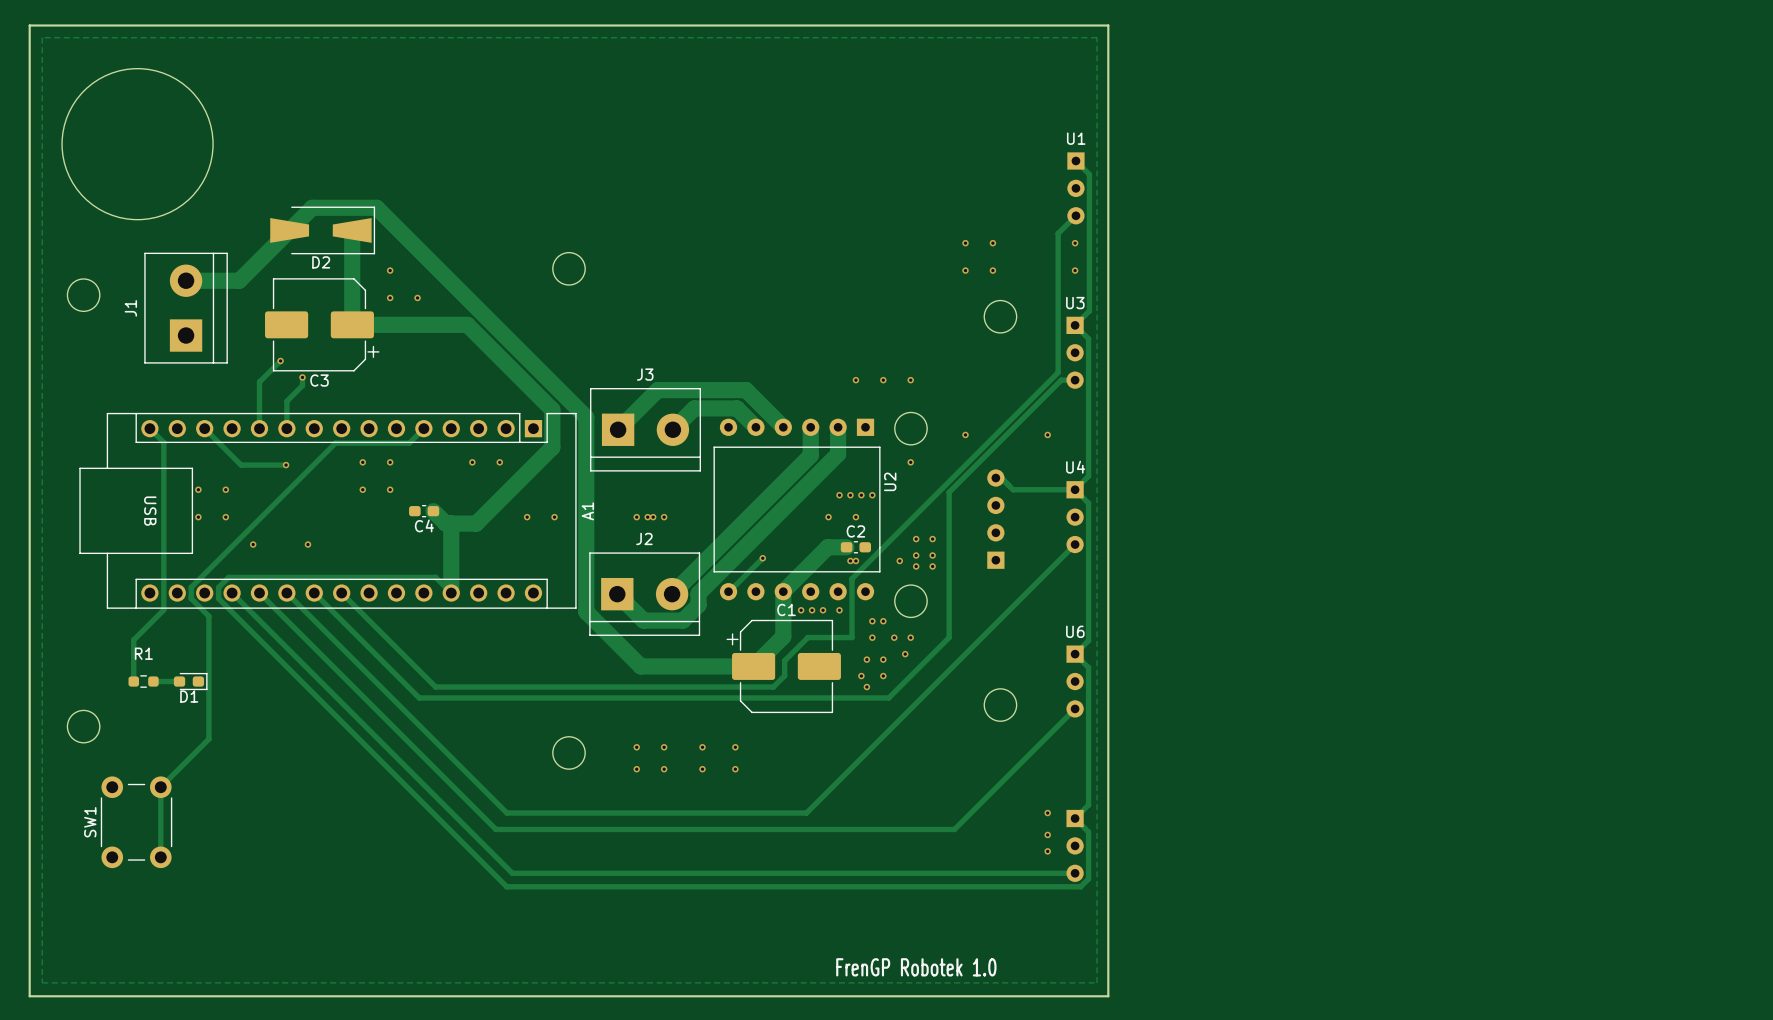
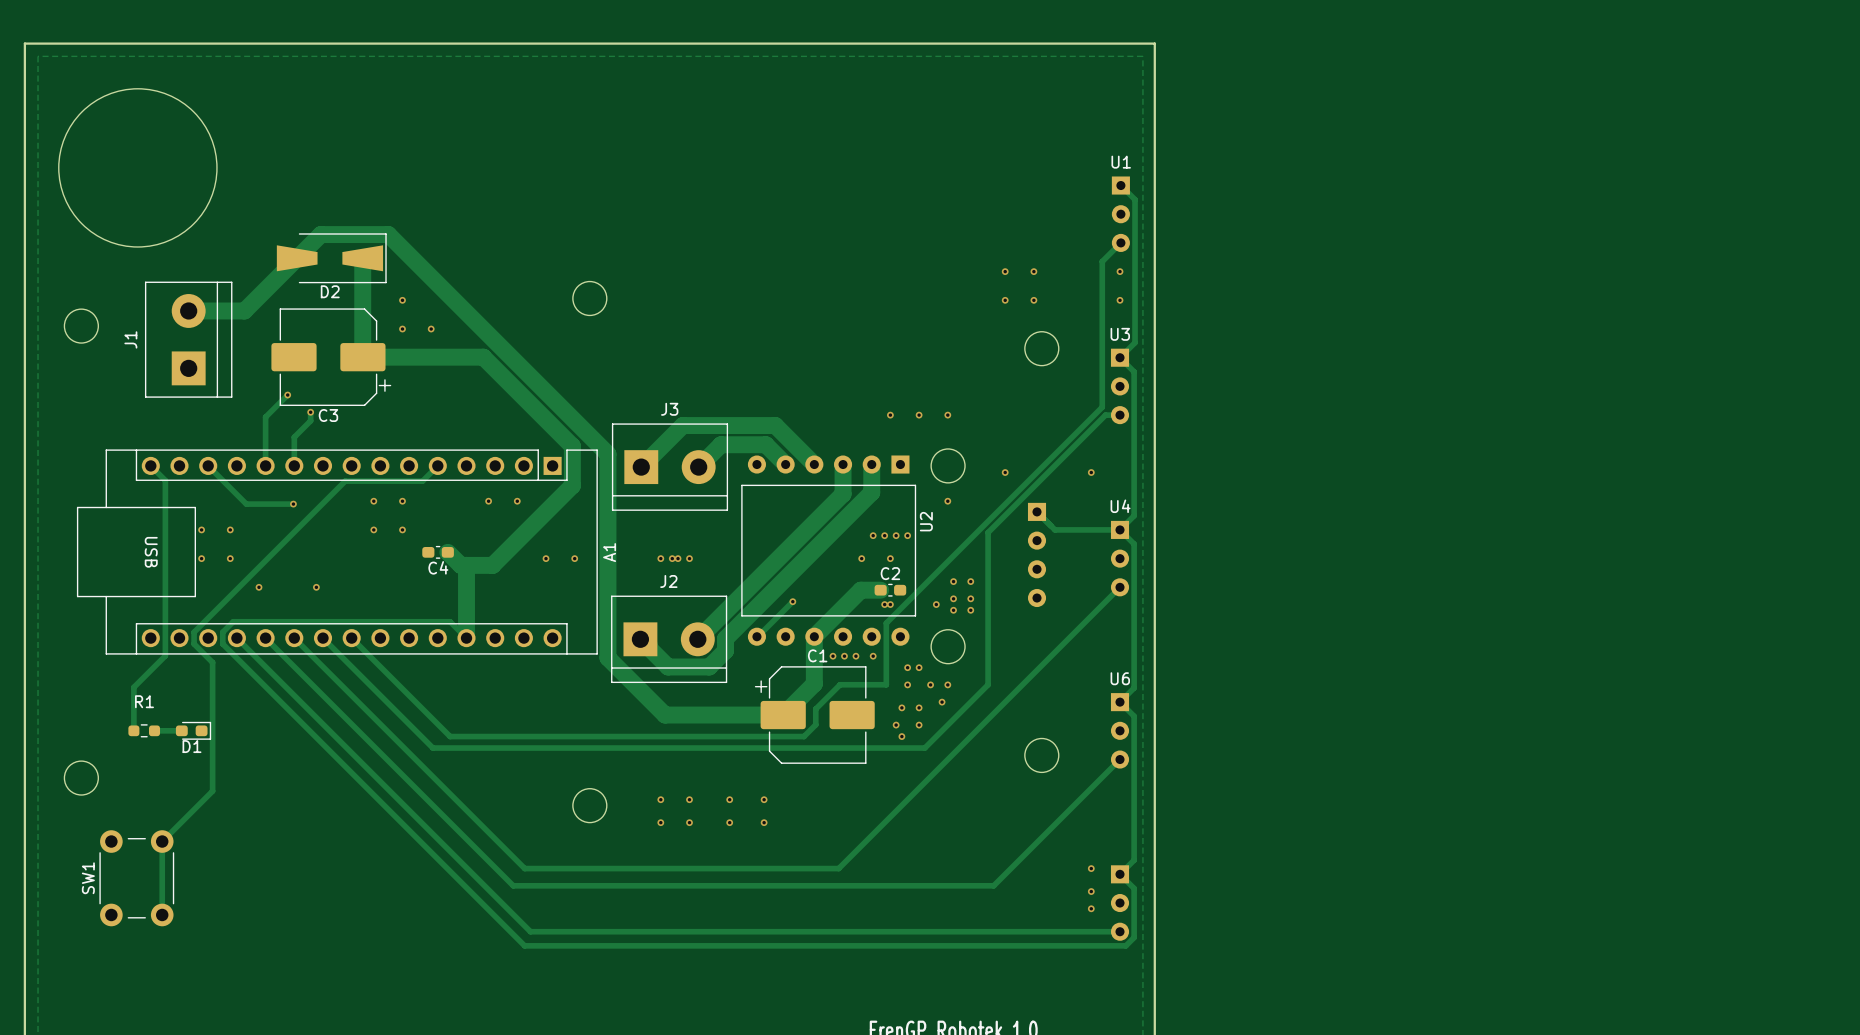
part rotation: 0° (995, 519) -> 180° (1037, 554)

